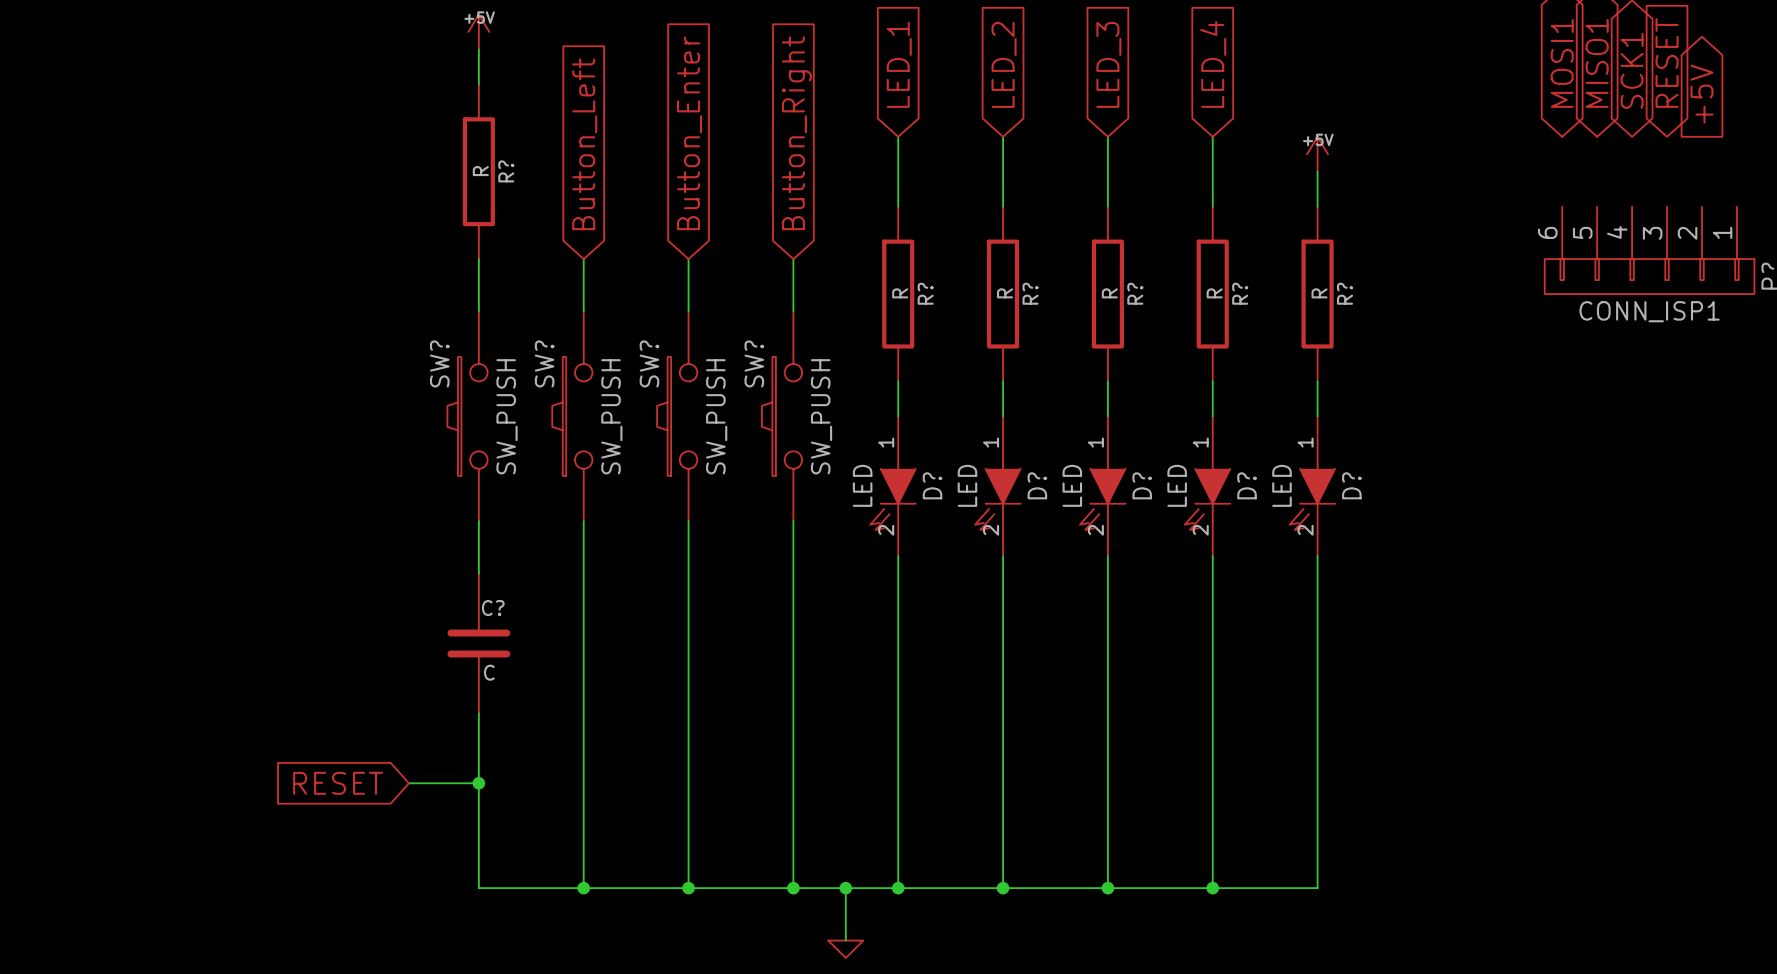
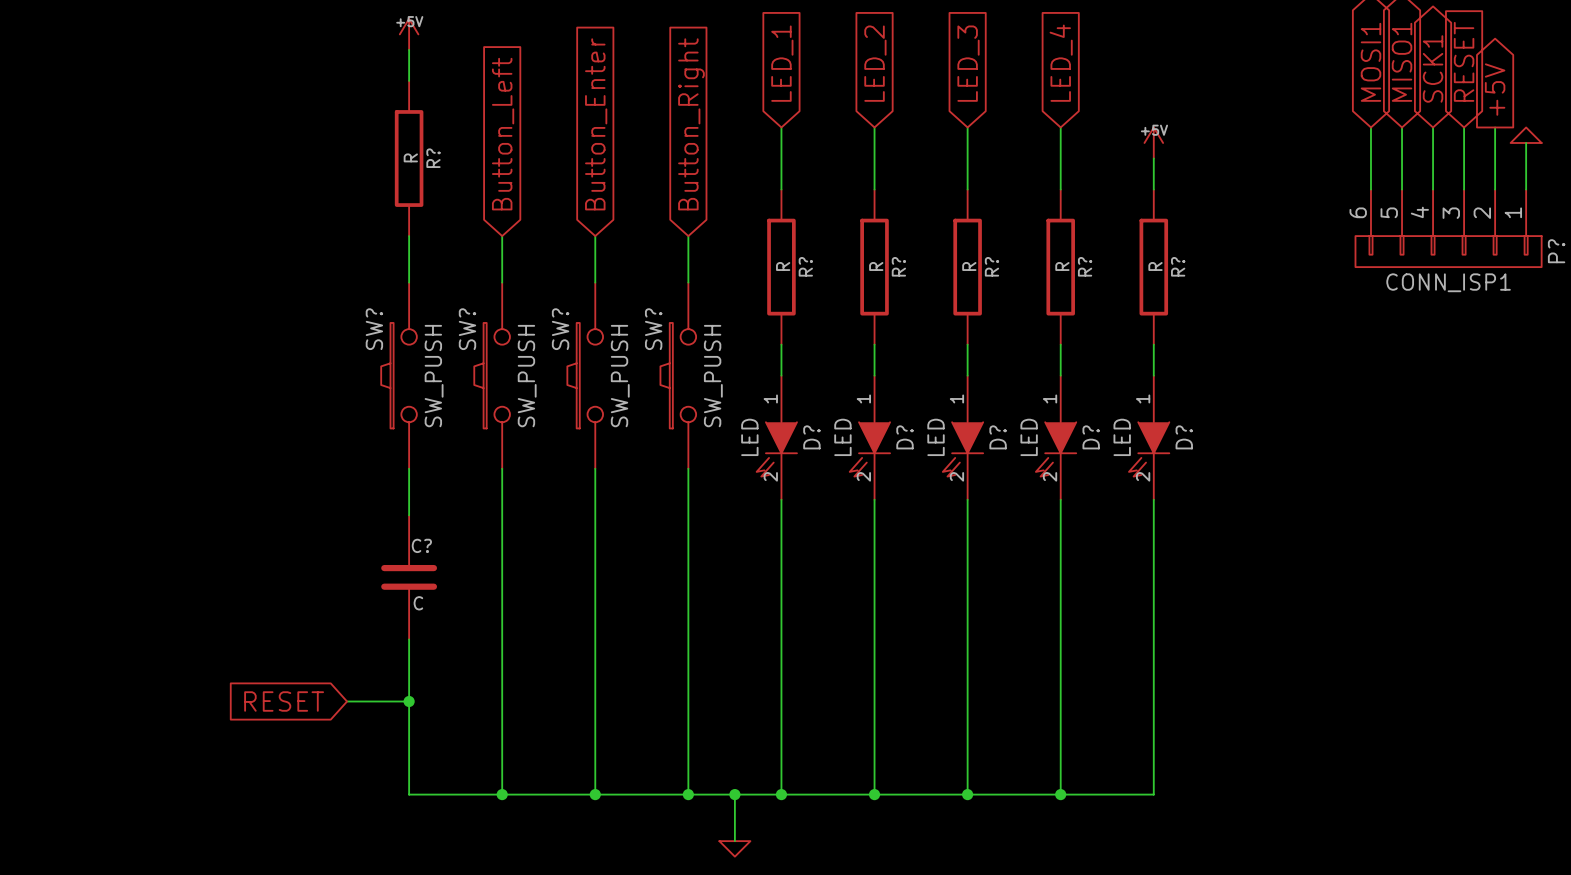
wire: none -> (1370, 127) (1370, 189)
wire: none -> (1402, 127) (1402, 189)
wire: none -> (1433, 127) (1433, 189)
wire: none -> (1464, 127) (1464, 189)
wire: none -> (1495, 127) (1495, 189)
power symbol: none -> (1526, 135)
wire: none -> (1526, 142) (1526, 189)

